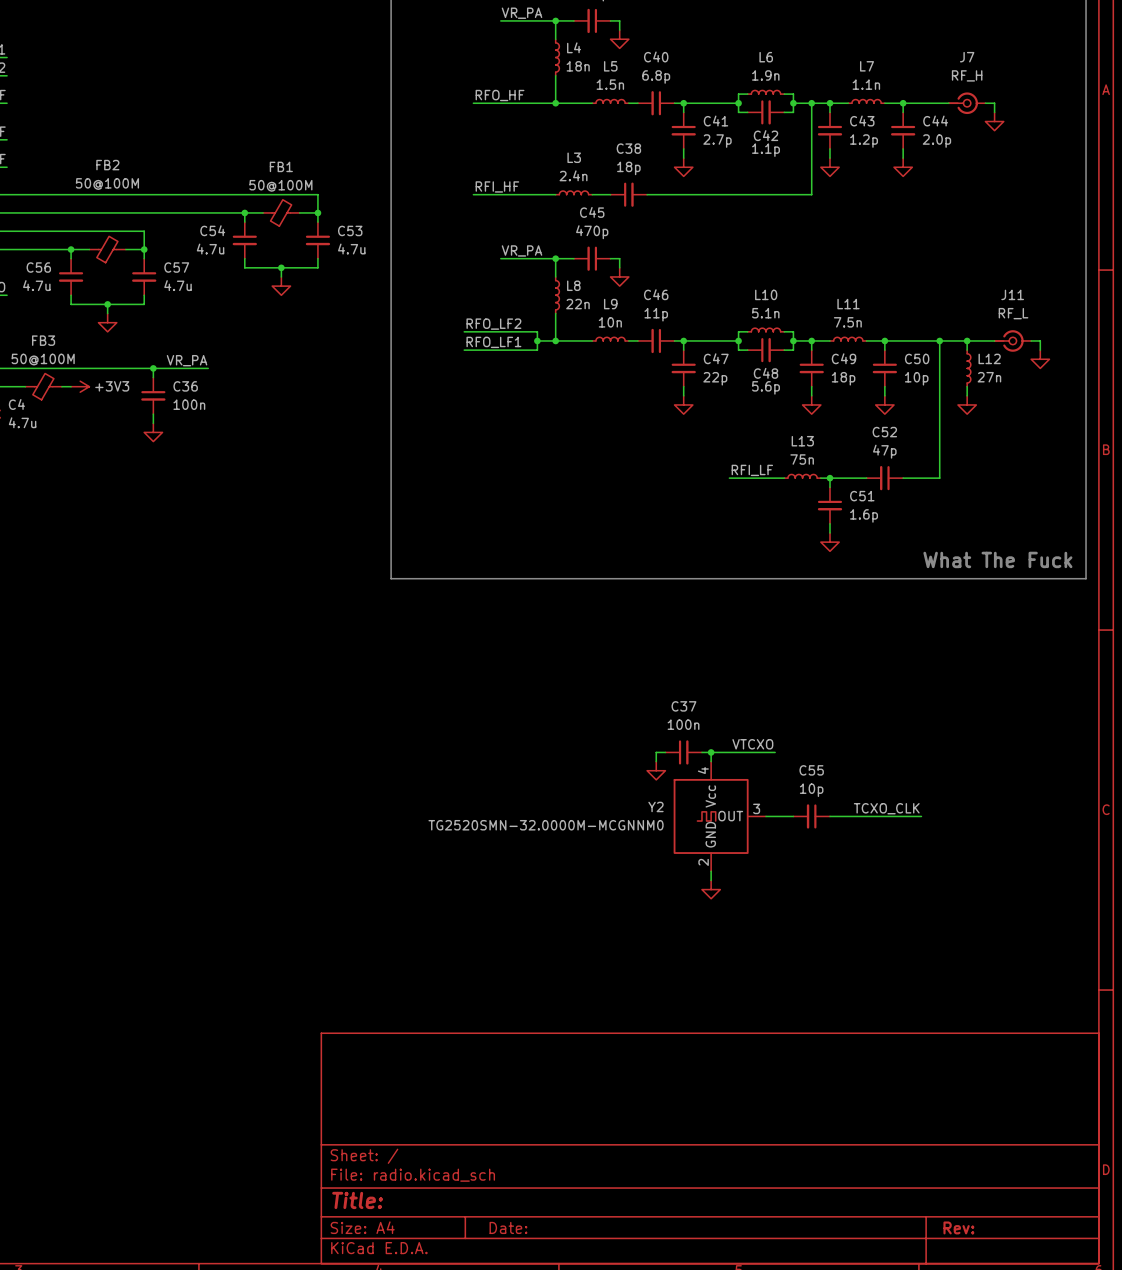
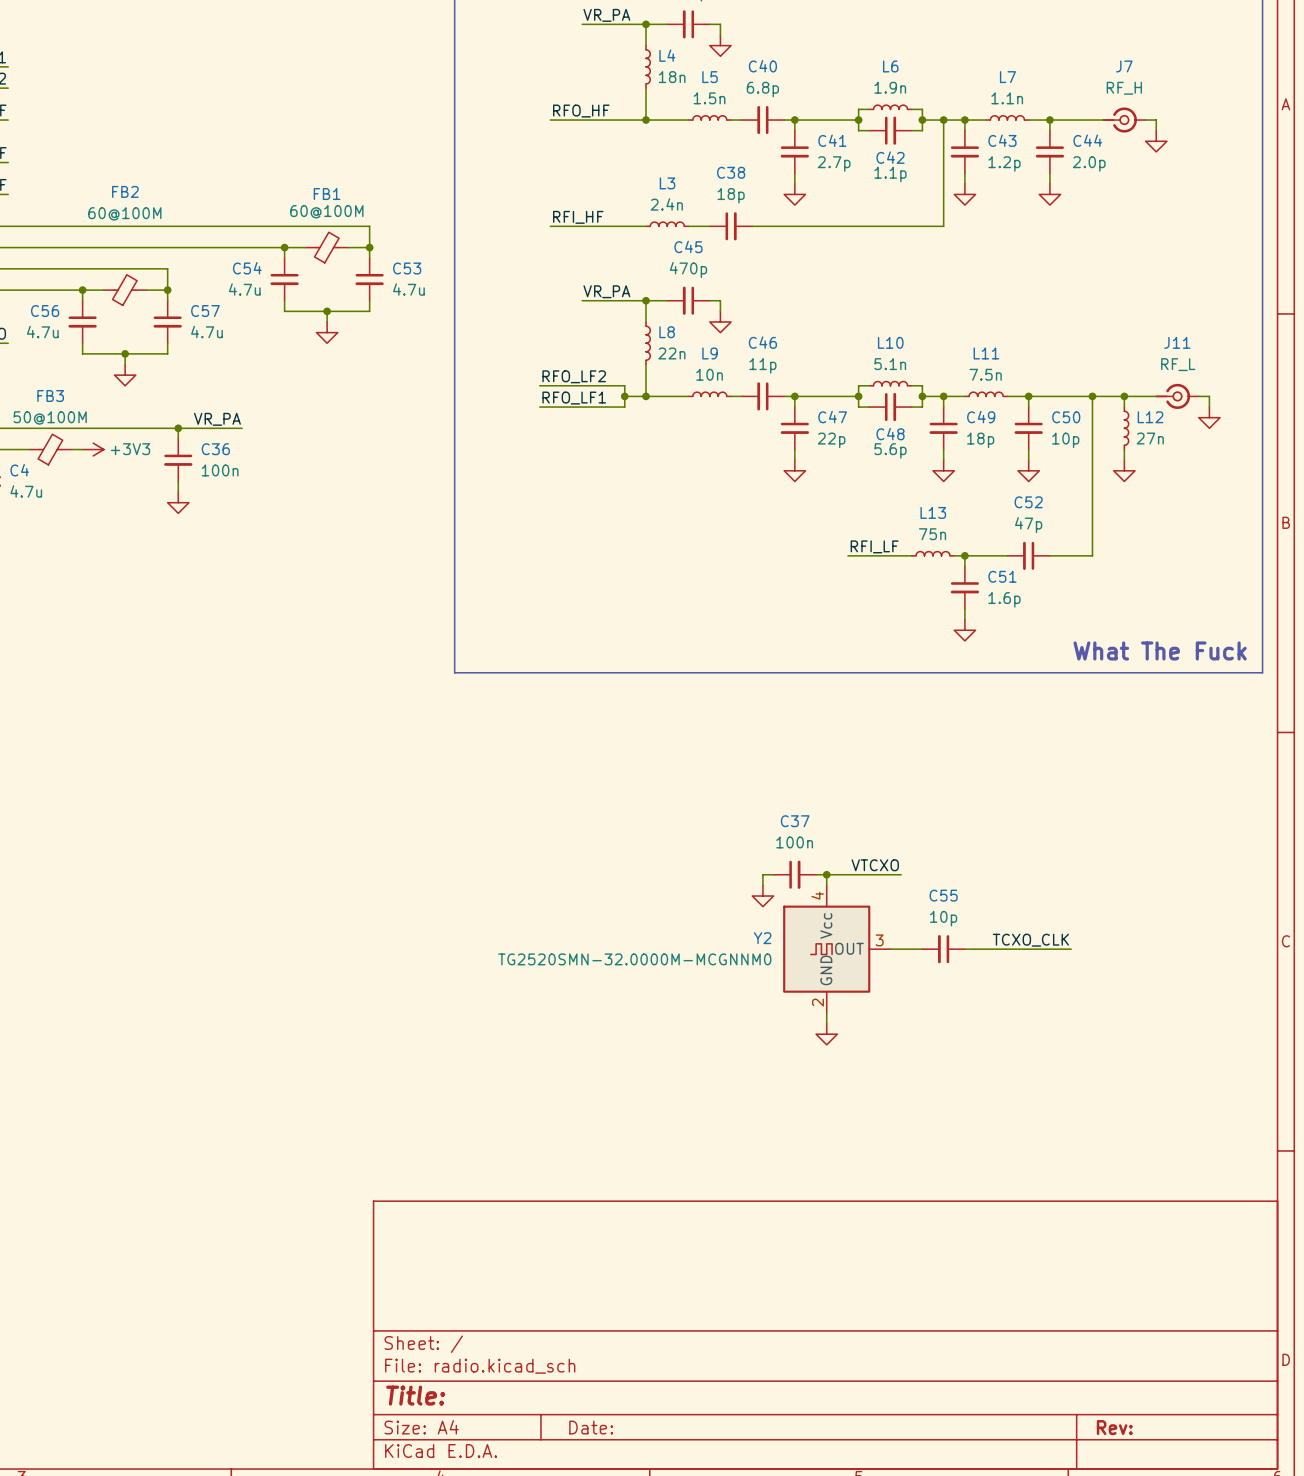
FB2 value: 50@100M (107, 184) -> 60@100M (124, 213)
FB1 value: 50@100M (280, 185) -> 60@100M (326, 211)

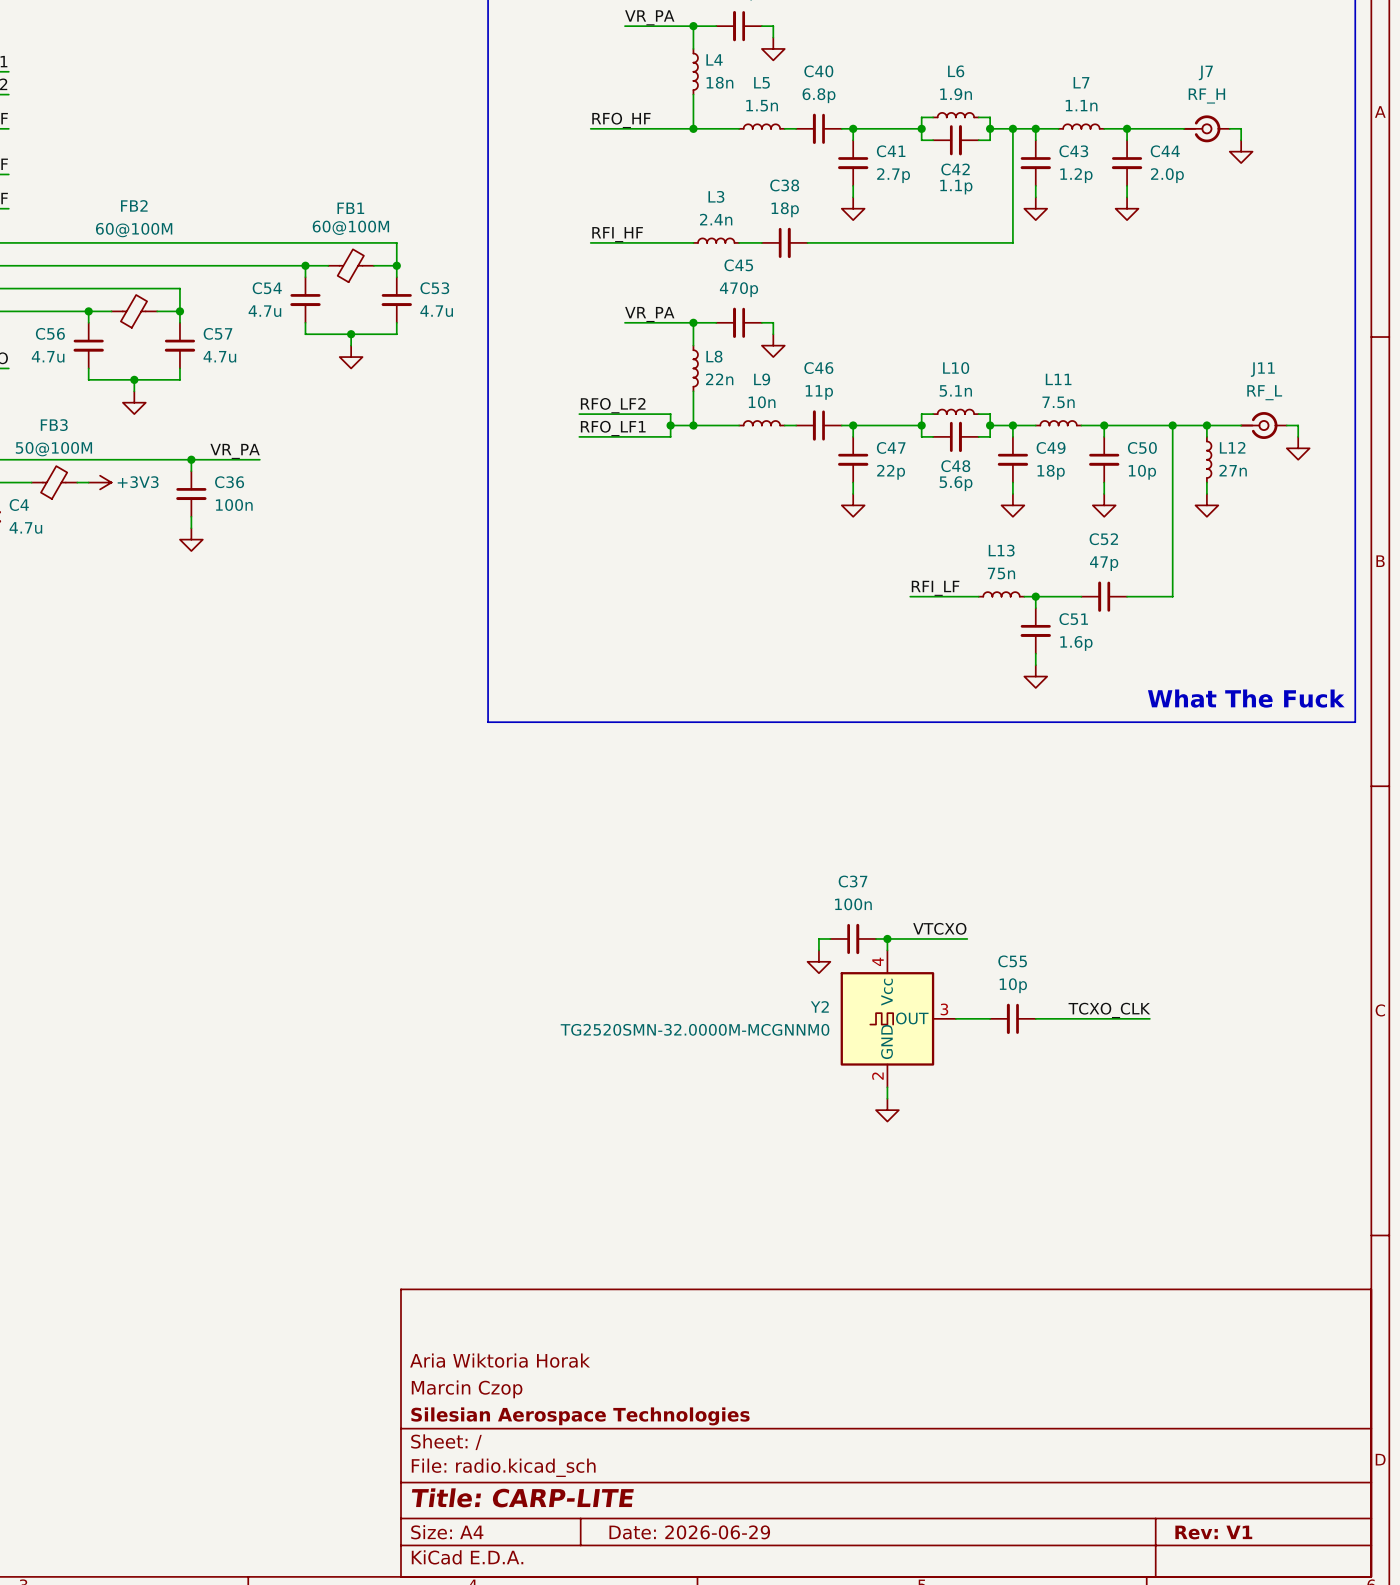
title block: none -> Aria Wiktoria Horak (500, 1360)
title block: none -> Marcin Czop (467, 1389)
title block: none -> Silesian Aerospace Technologies (580, 1416)
title block: Title: (415, 1395) -> Title: CARP-LITE (522, 1497)
title block: Date: (591, 1427) -> Date: 2026-06-29 (689, 1532)
title block: Rev: (1114, 1427) -> Rev: V1 (1213, 1532)

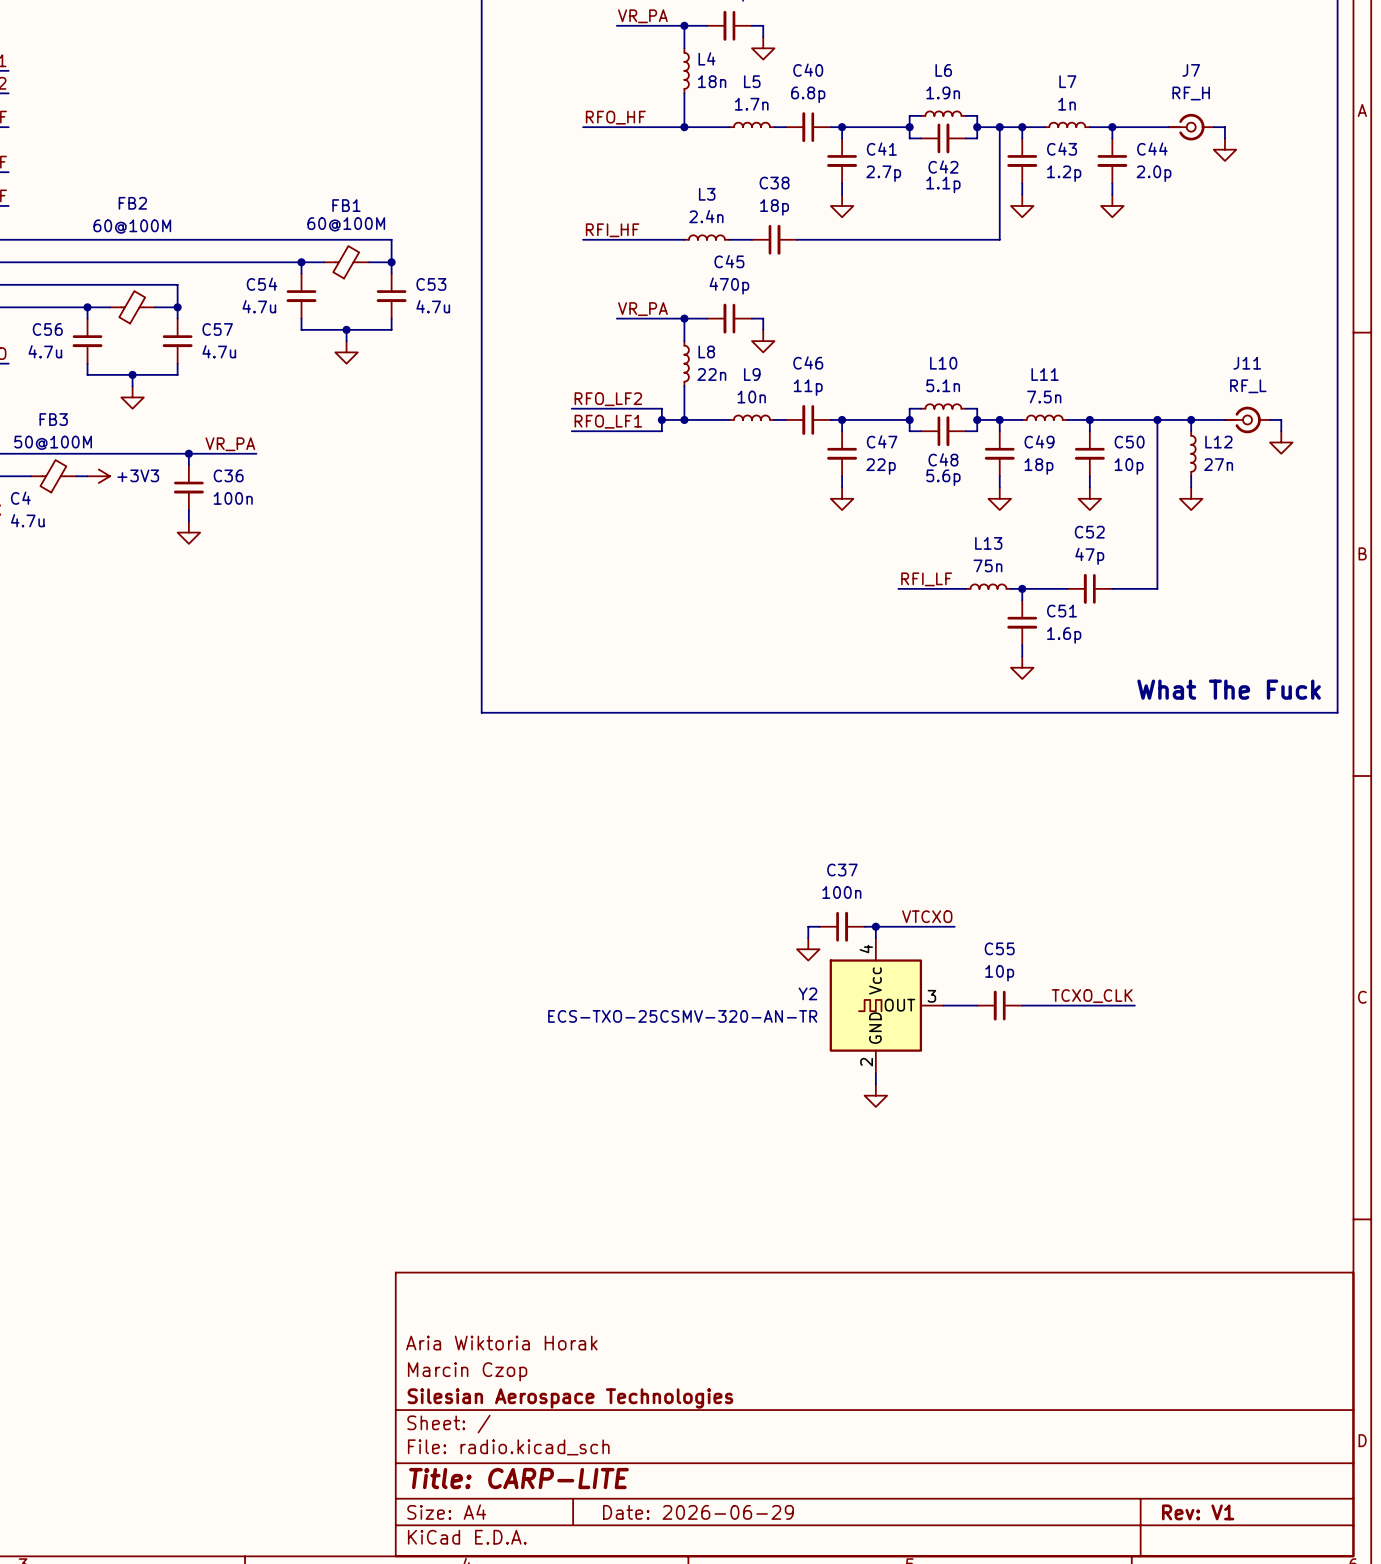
L5 value: 1.5n (762, 105) -> 1.7n (751, 104)
L7 value: 1.1n (1081, 105) -> 1n (1067, 104)
Y2 value: TG2520SMN-32.0000M-MCGNNM0 (695, 1029) -> ECS-TXO-25CSMV-320-AN-TR (682, 1016)

